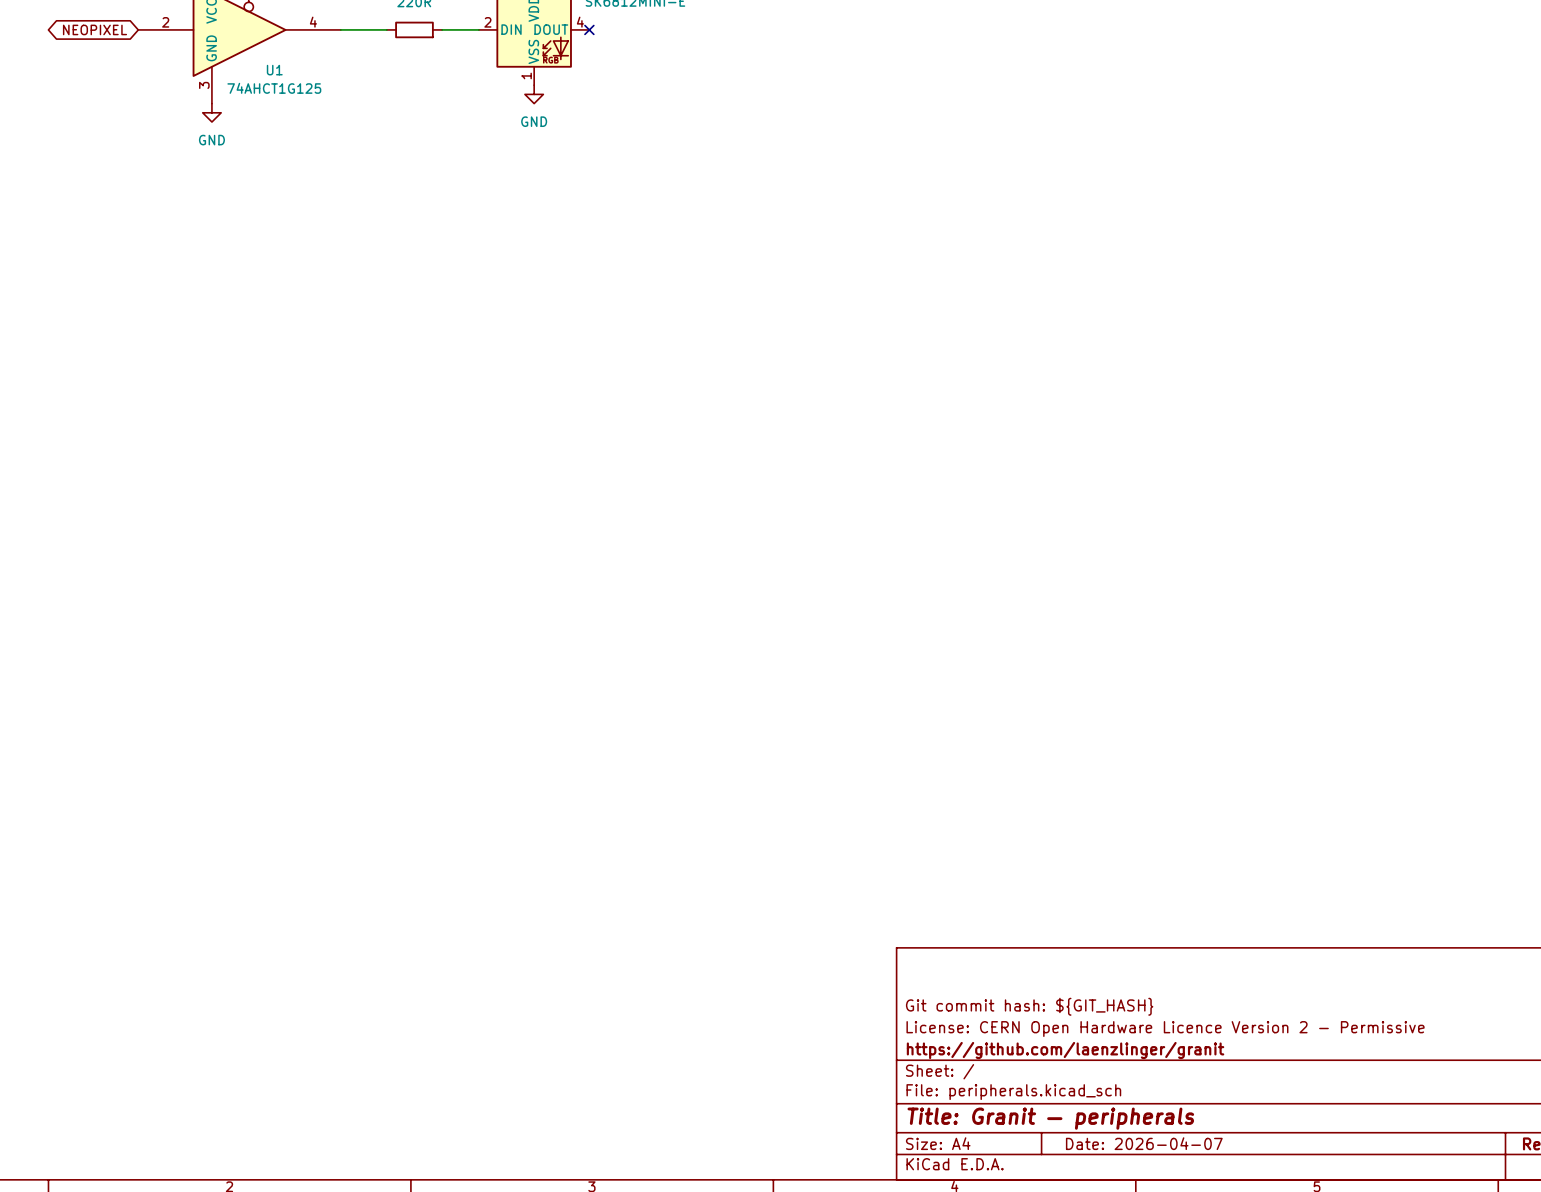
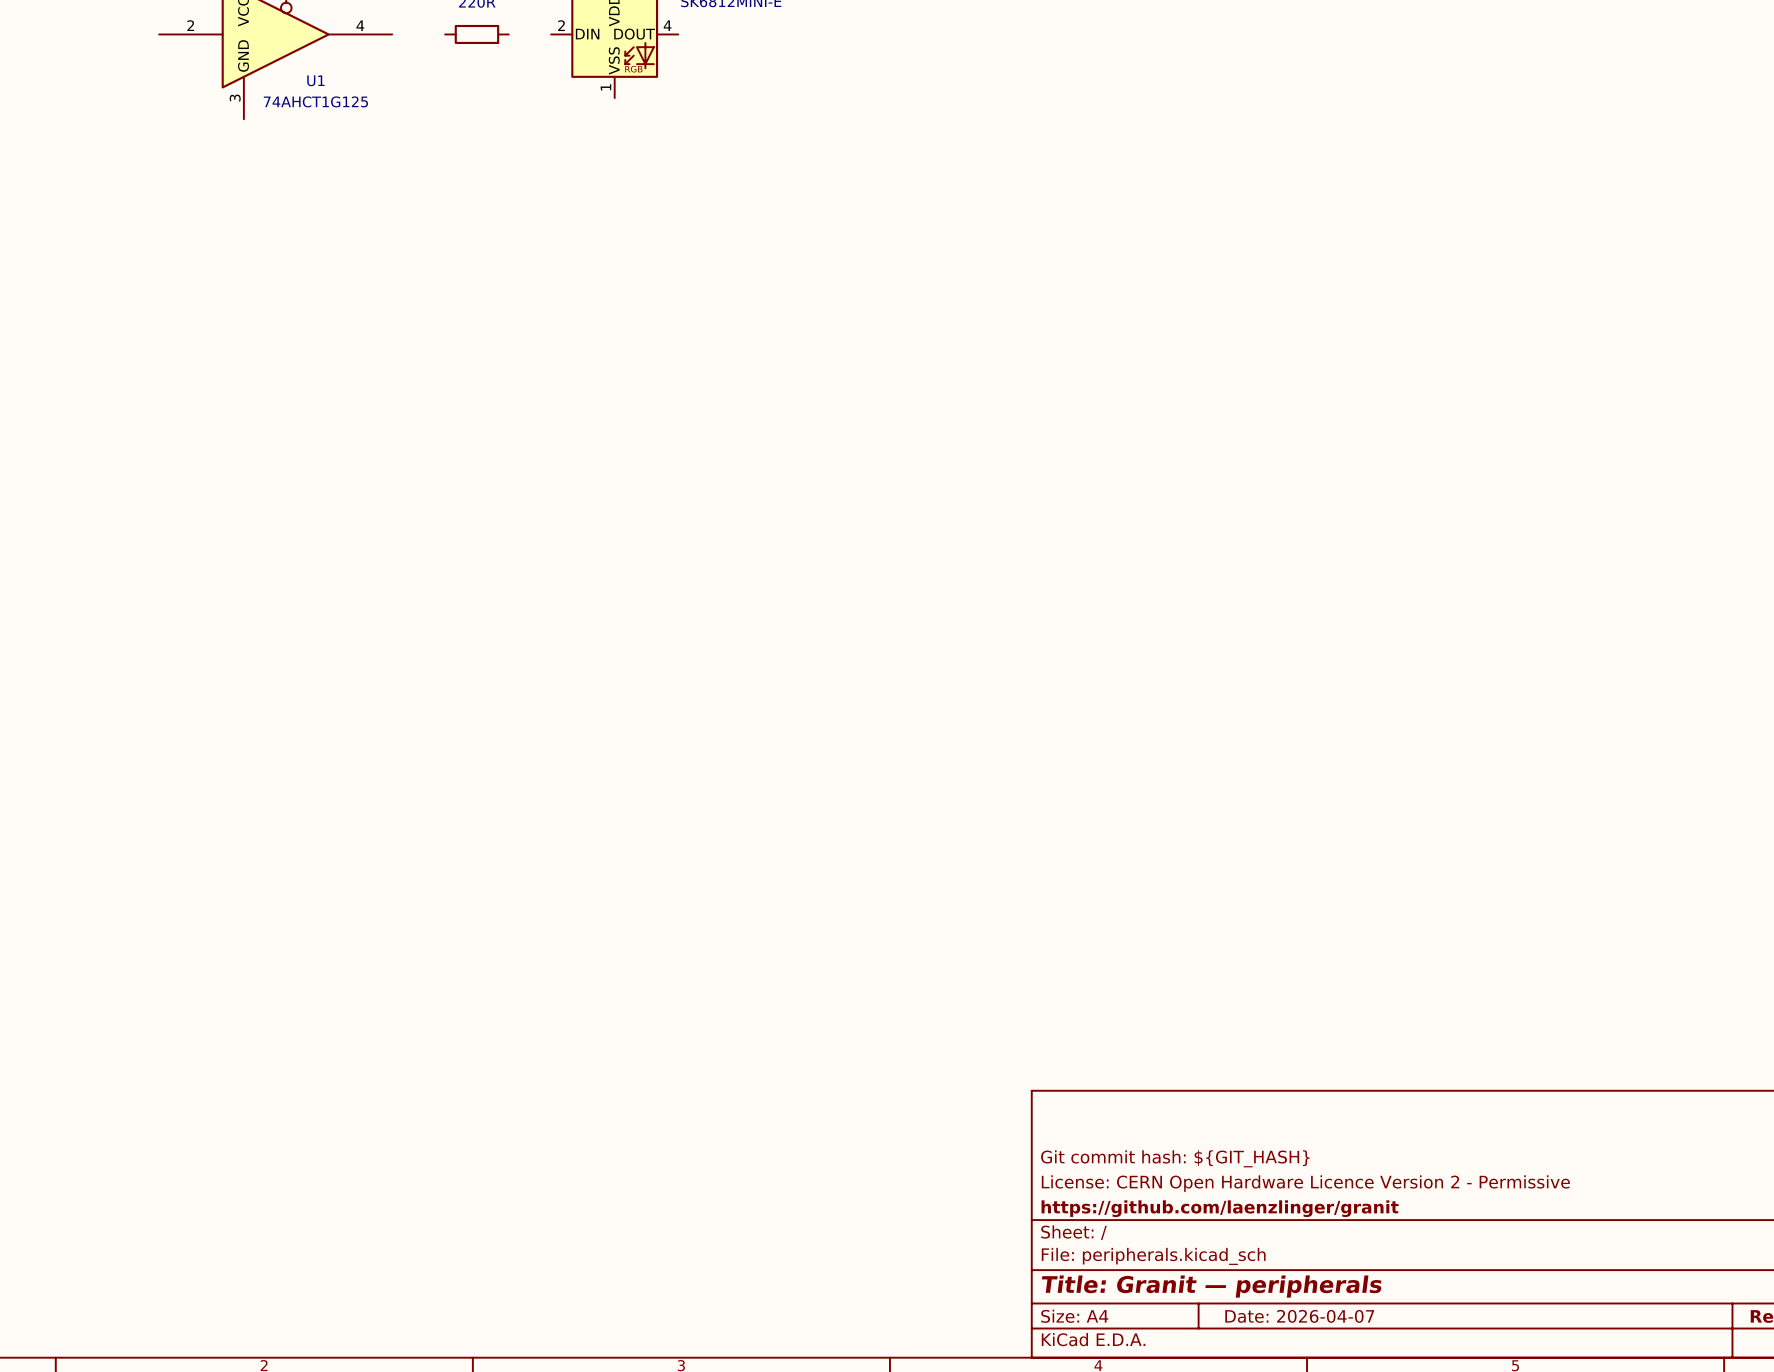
global label: NEOPIXEL (94, 29) -> none
wire: (340, 29) (386, 29) -> none
wire: (442, 29) (478, 29) -> none
no-connect mark: (589, 29) -> none
power symbol: GND (534, 94) -> none
power symbol: GND (211, 112) -> none

